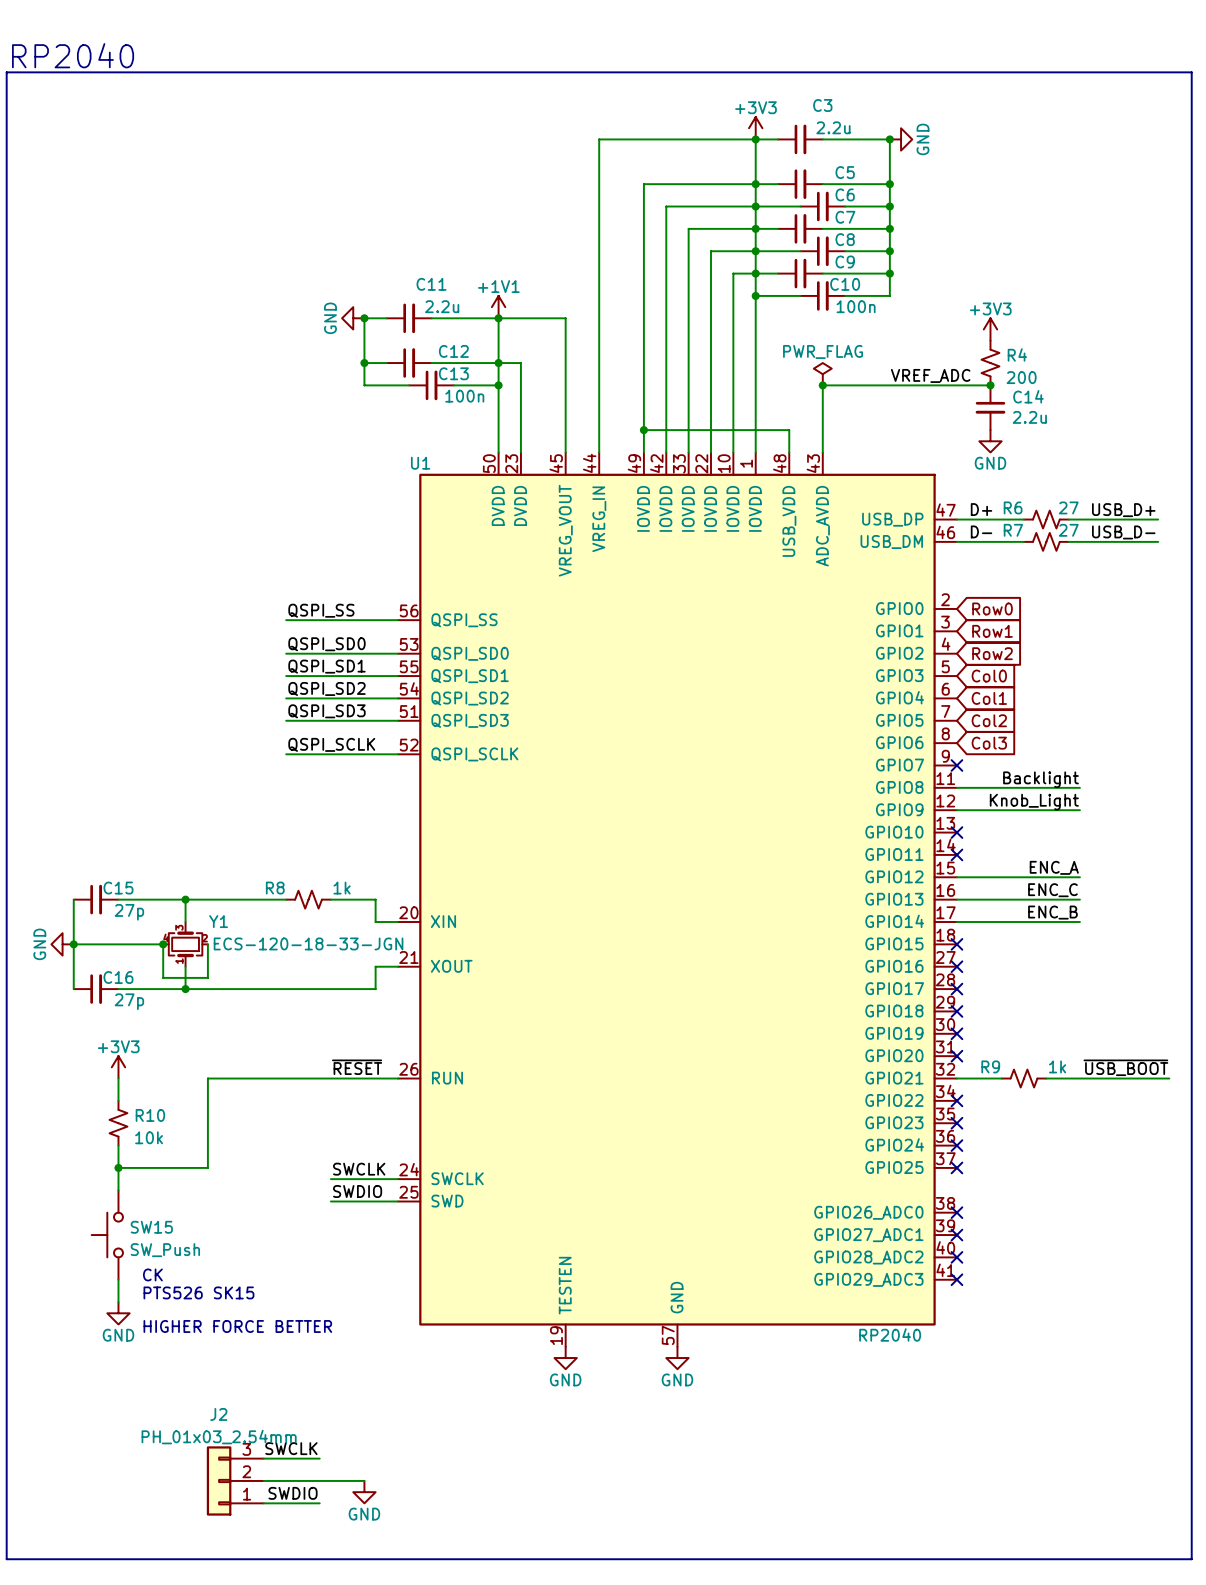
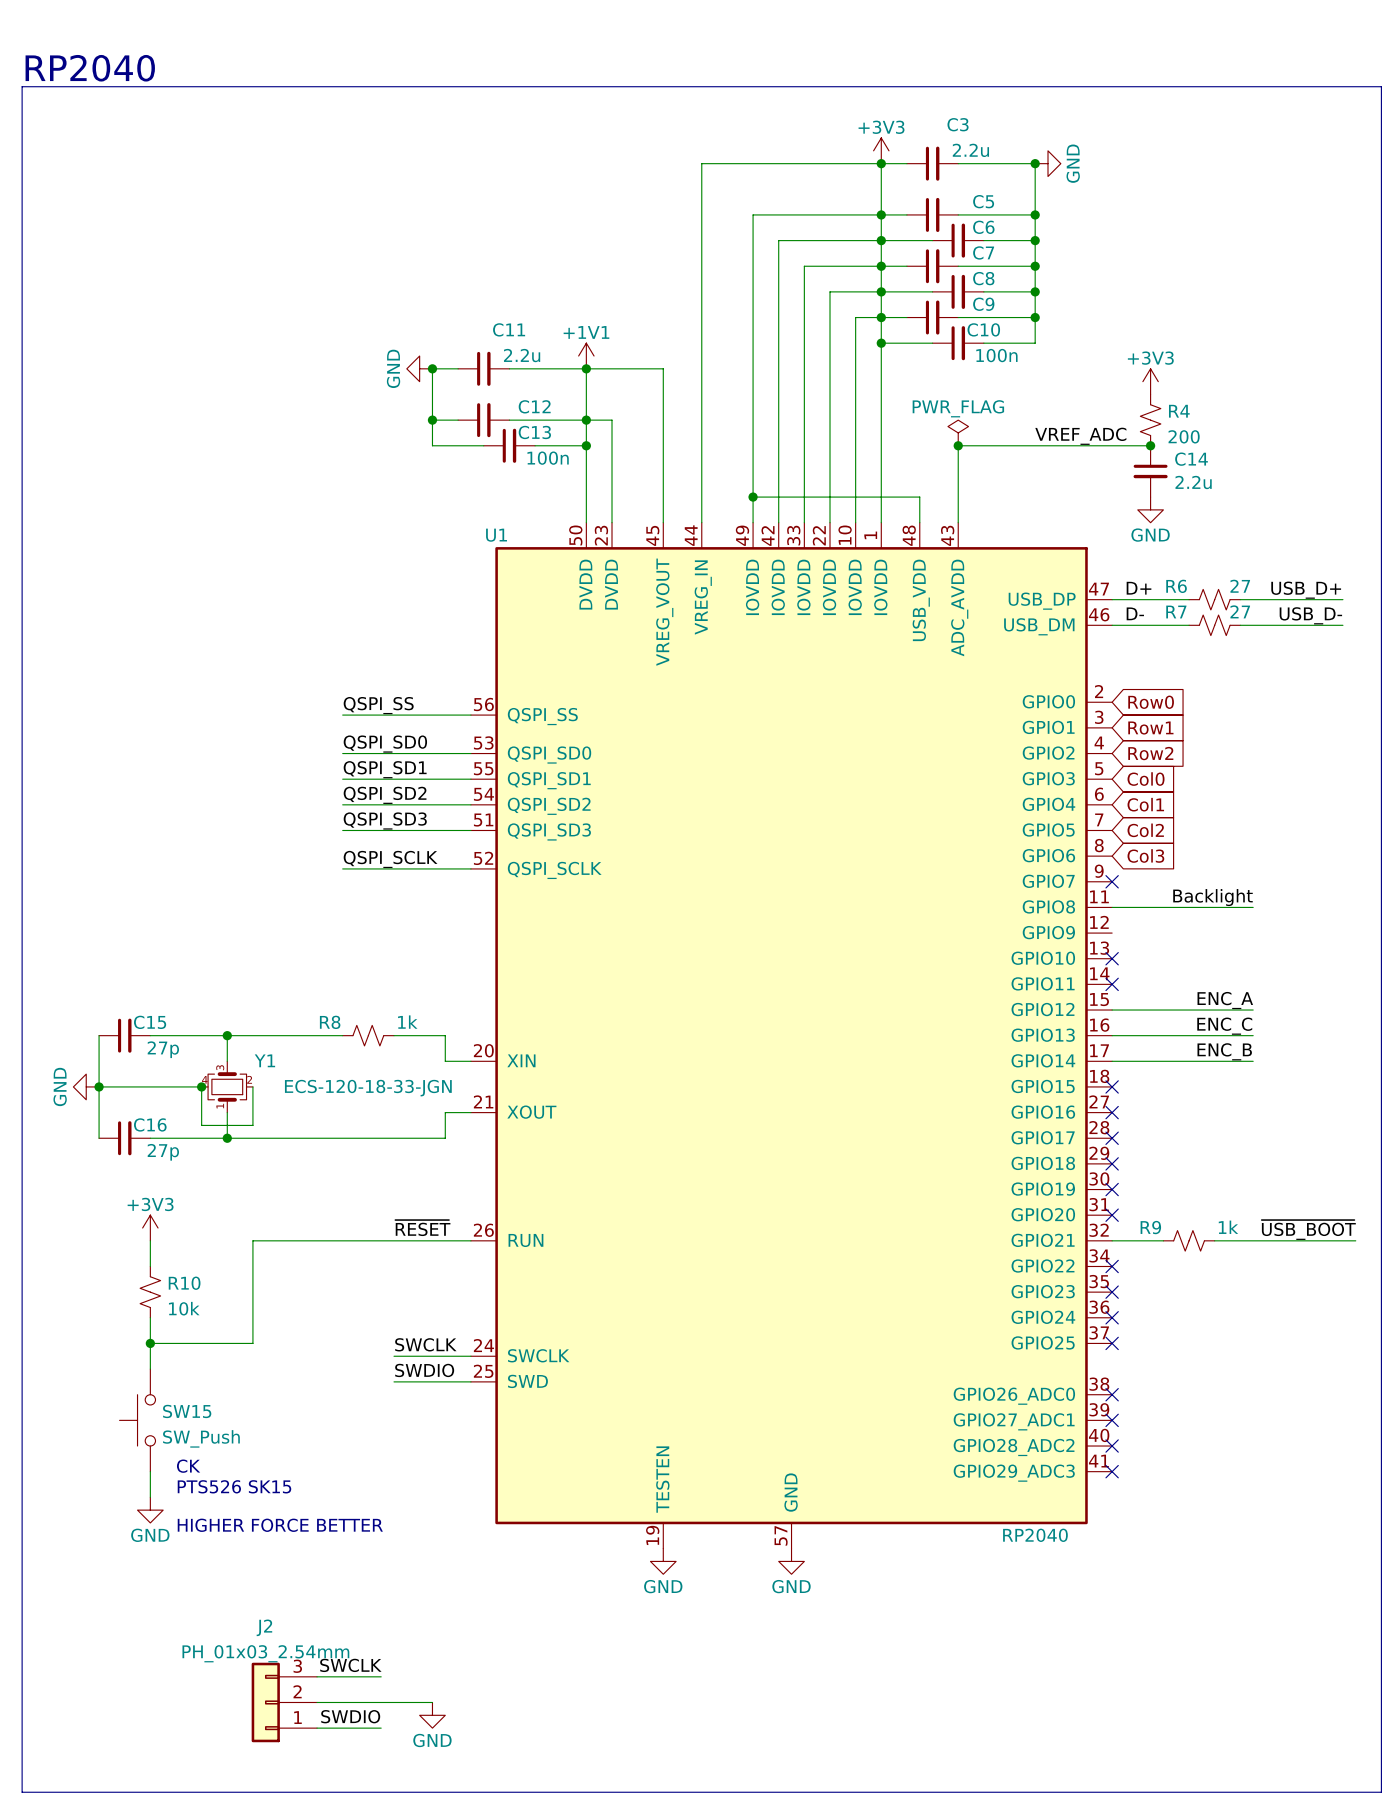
label: Knob_Light (1034, 802) -> none
wire: (956, 810) (1079, 810) -> none

